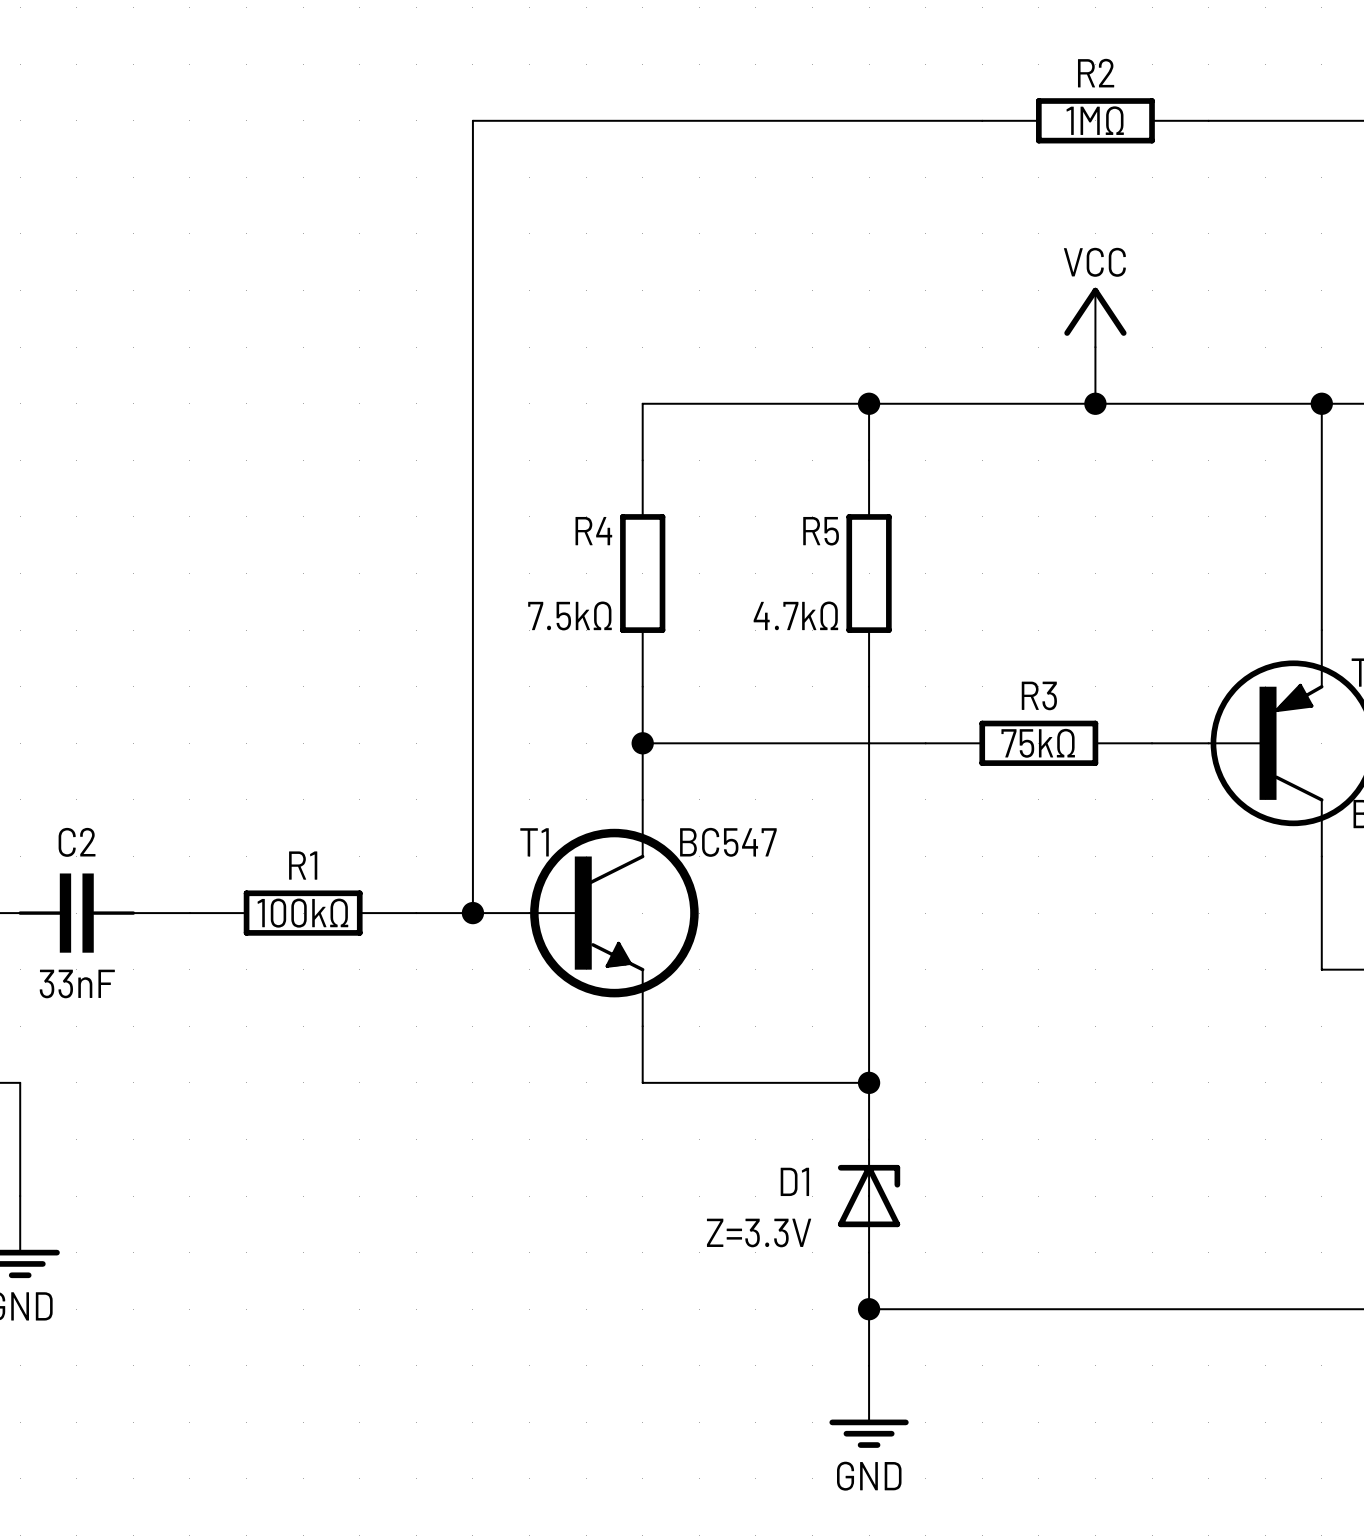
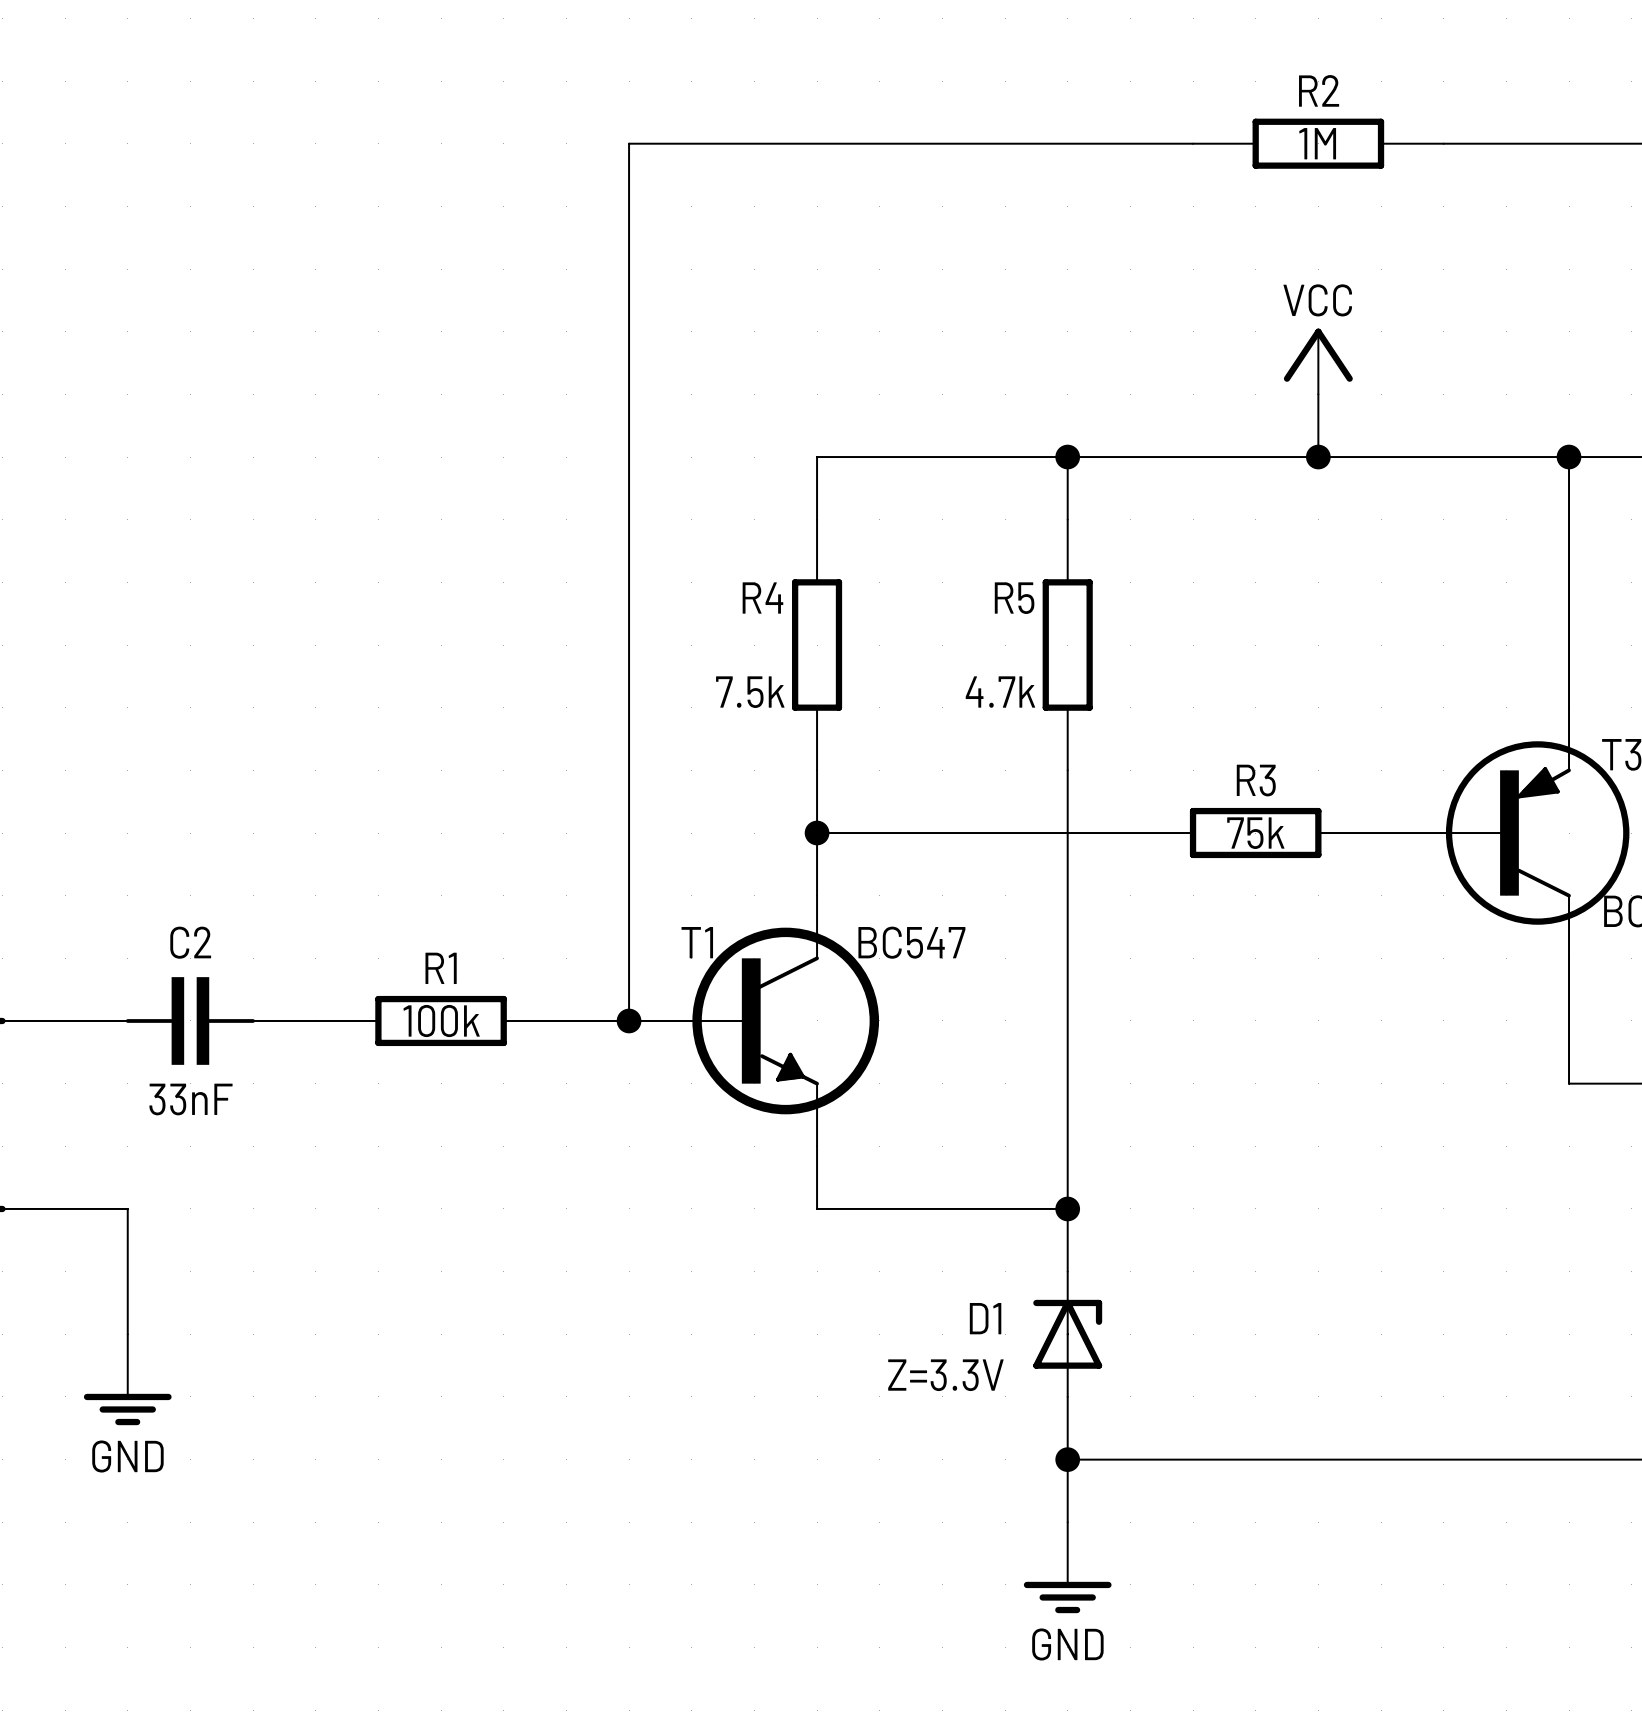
R2 value: 1MΩ (1095, 120) -> 1M (1317, 143)
R4 value: 7.5kΩ (569, 615) -> 7.5k (750, 692)
R5 value: 4.7kΩ (795, 615) -> 4.7k (1000, 692)
R3 value: 75kΩ (1038, 743) -> 75k (1255, 833)
R1 value: 100kΩ (302, 913) -> 100k (441, 1021)

